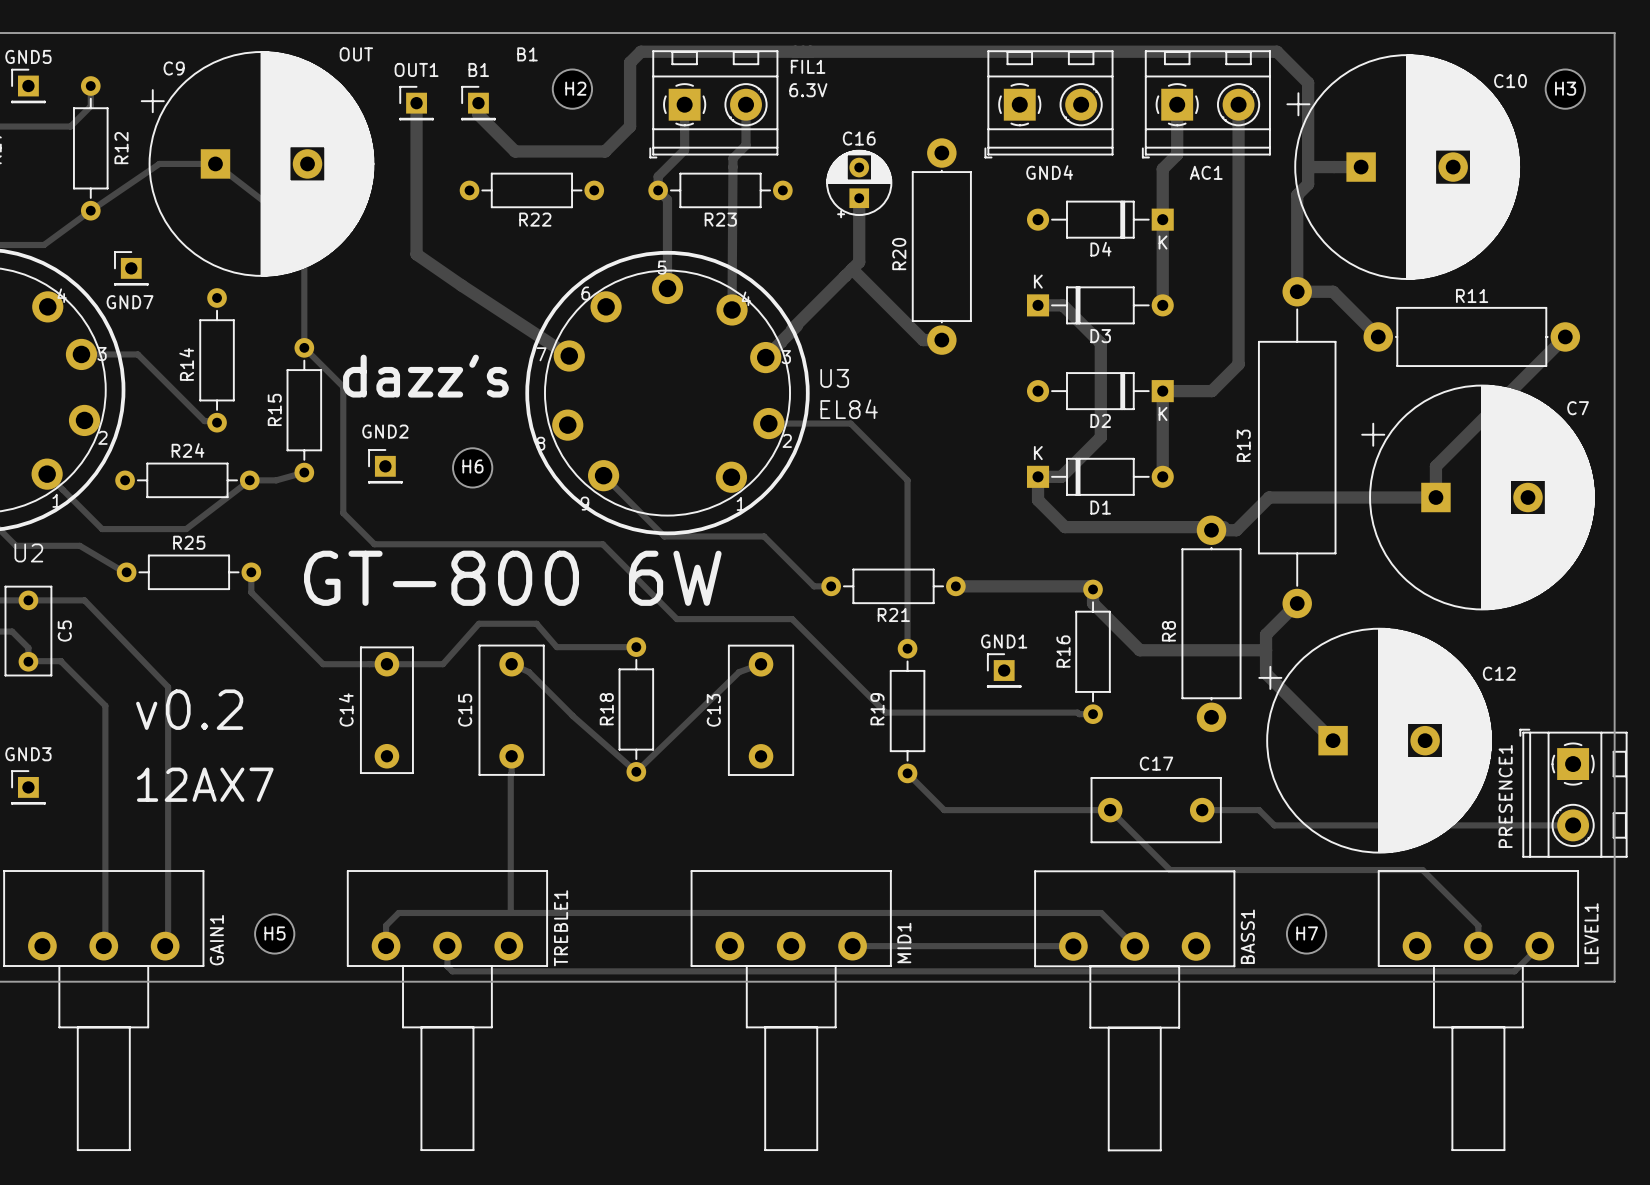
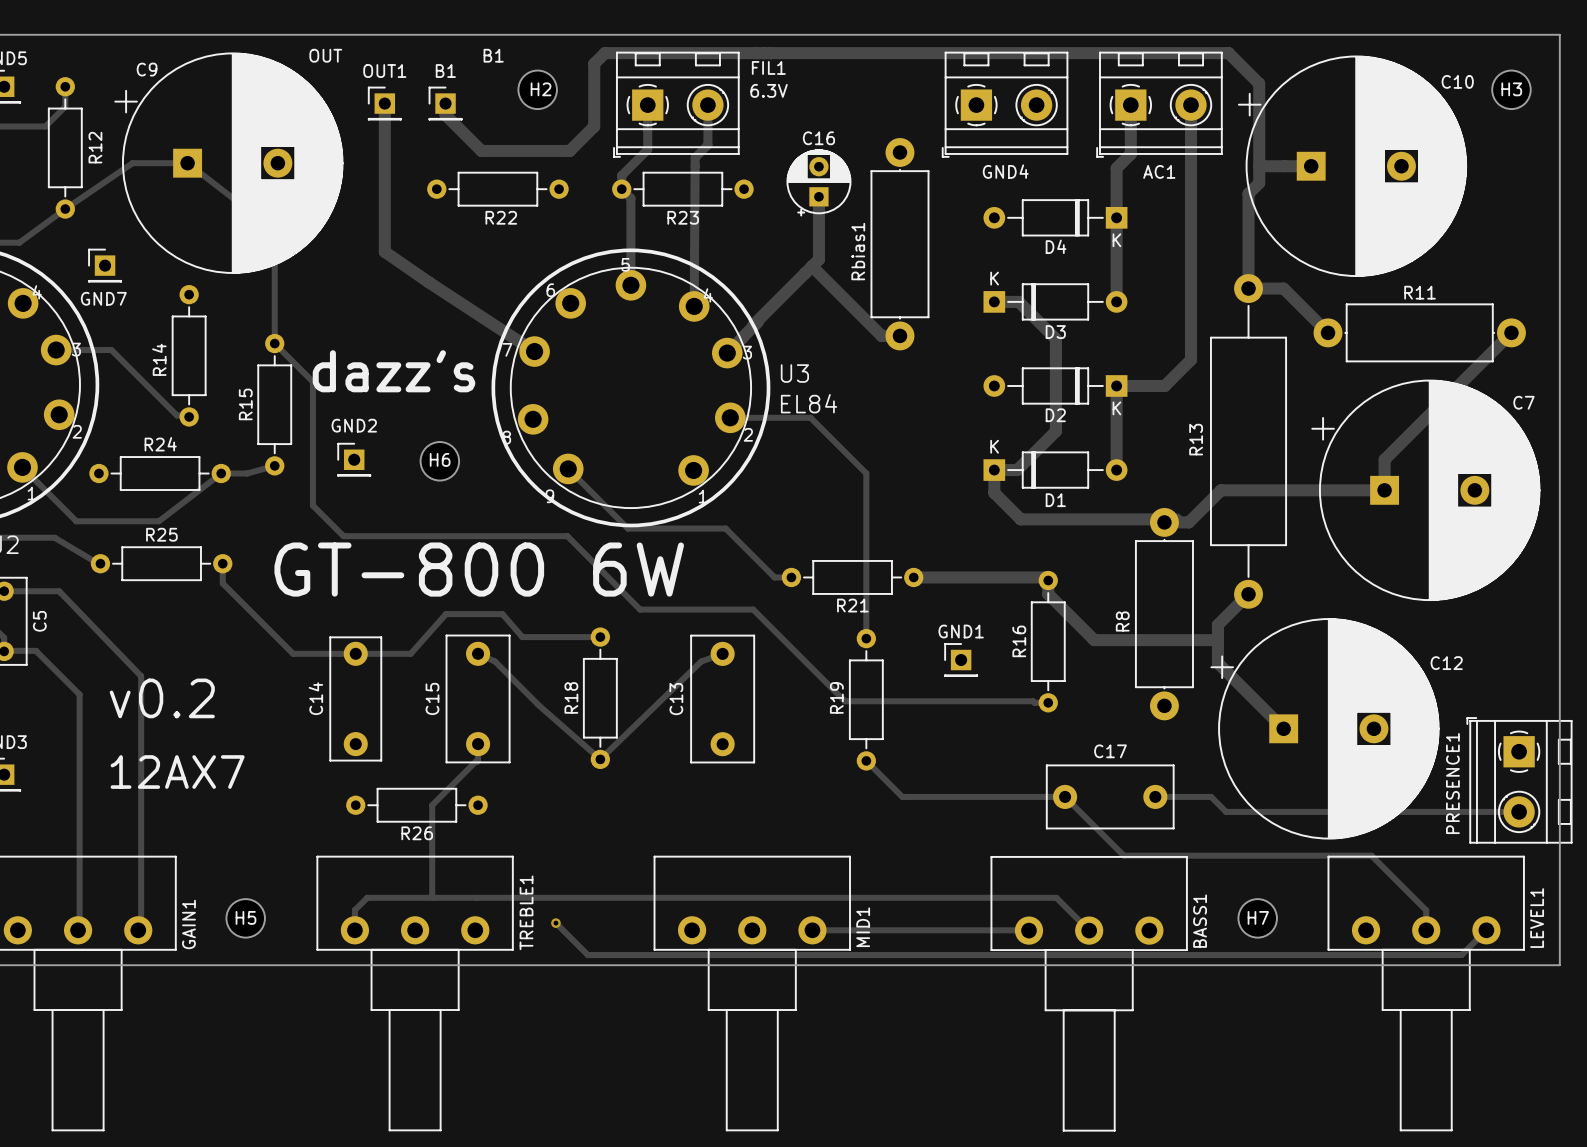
R20 name: R20 (899, 254) -> Rbias1 (858, 251)
track: none -> (478, 761) (432, 805) (433, 897)
track: (510, 774) (510, 912) -> none
R26: none -> (416, 805)
via: none -> (555, 923)
track: (447, 946) (447, 966) (452, 971) (623, 971) -> (555, 923) (587, 955)

